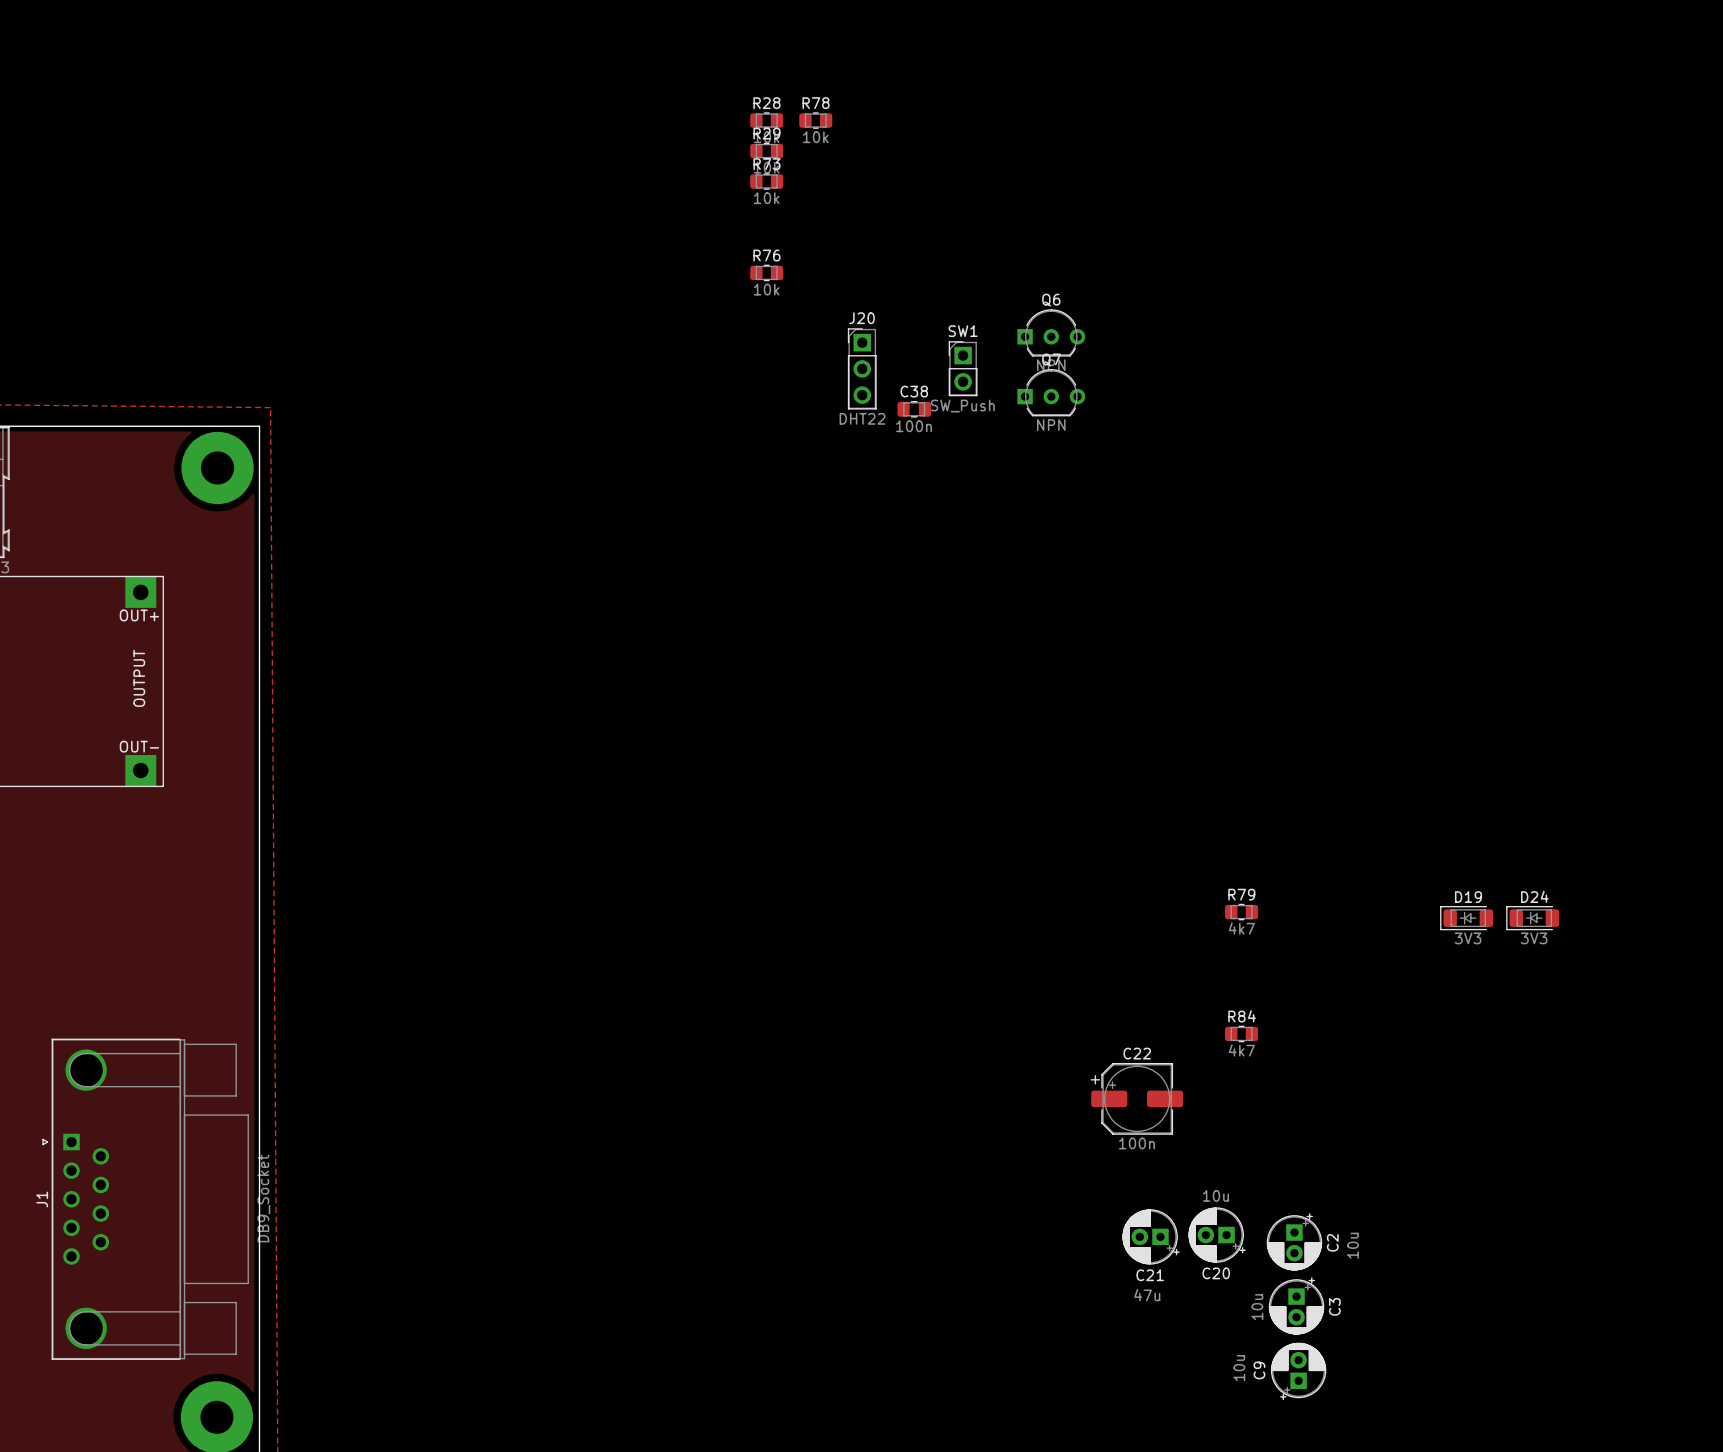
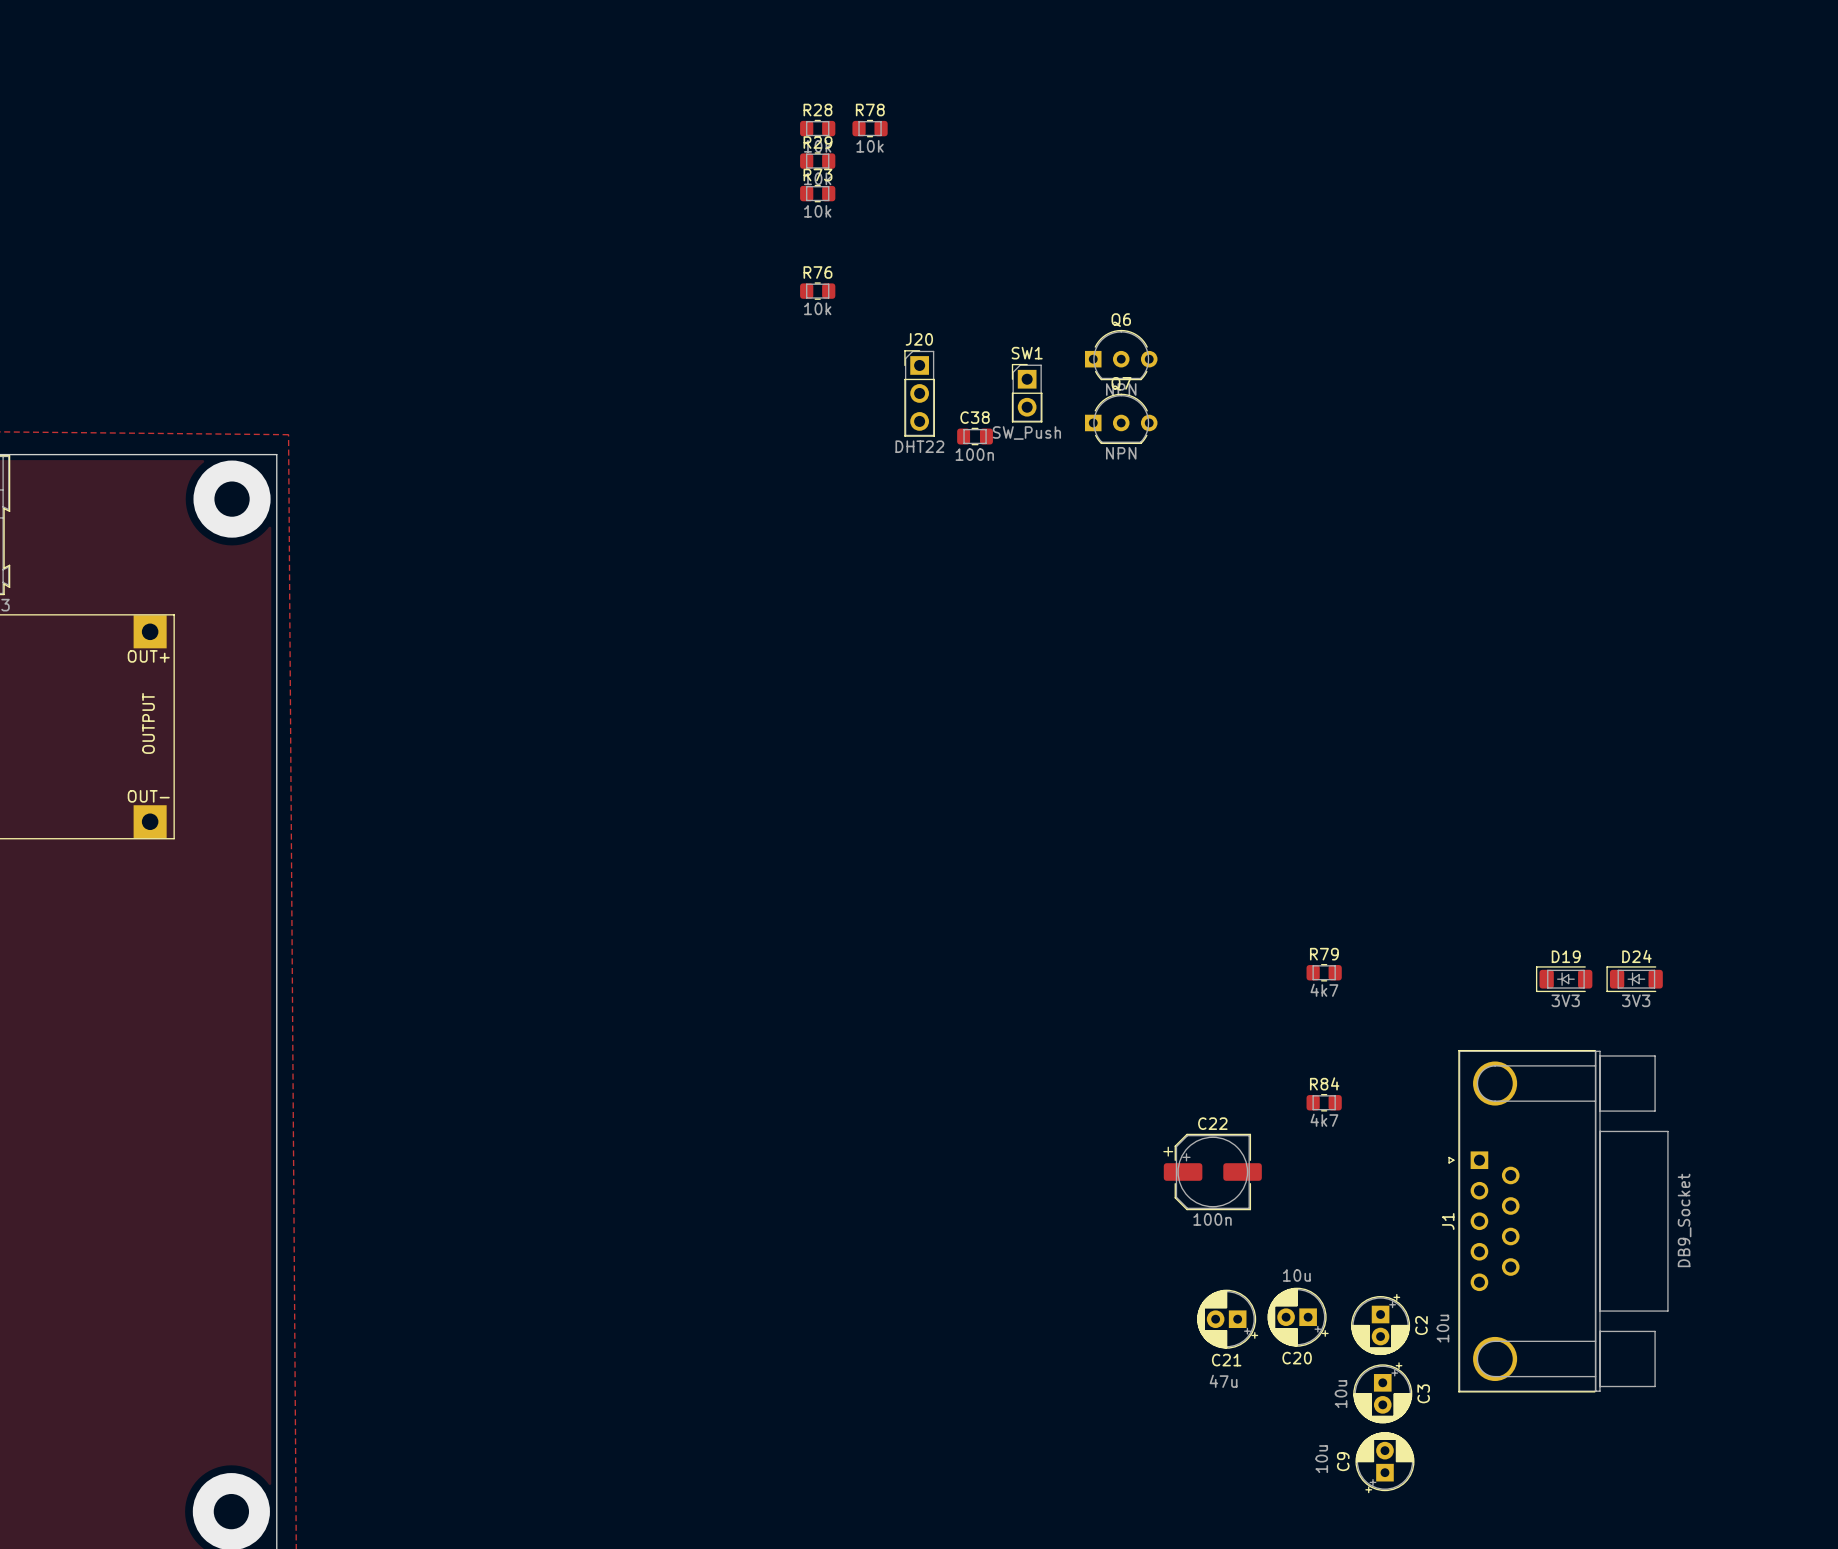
J1 position: (145, 1199) -> (1558, 1221)

